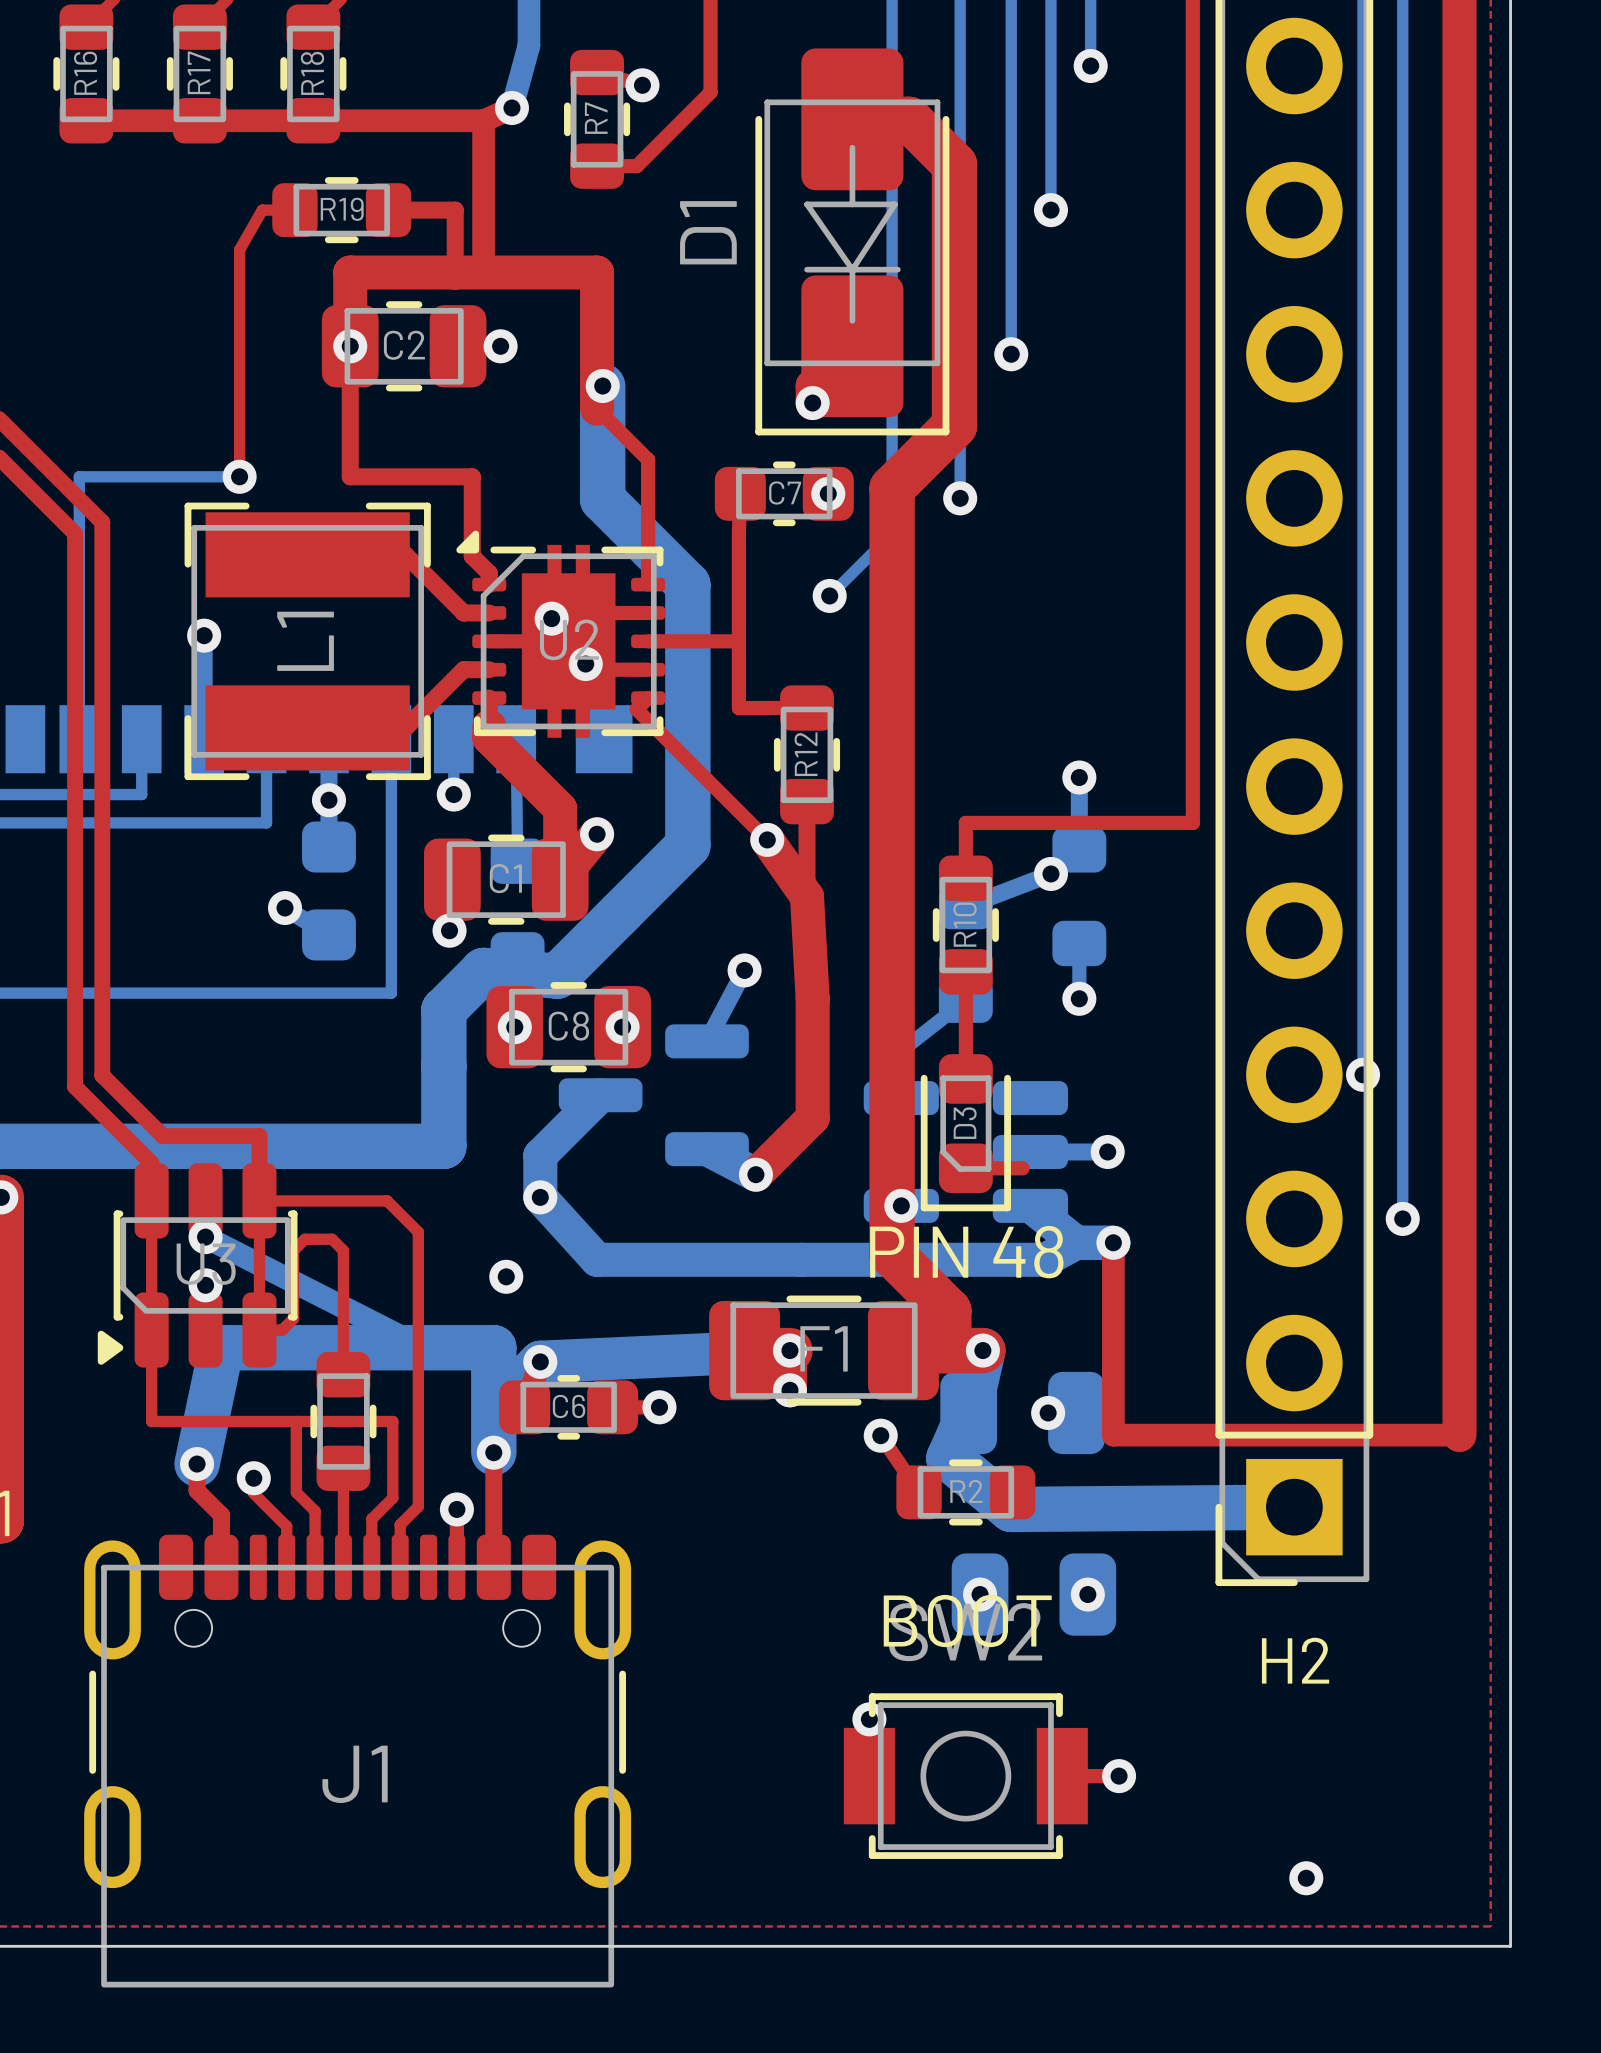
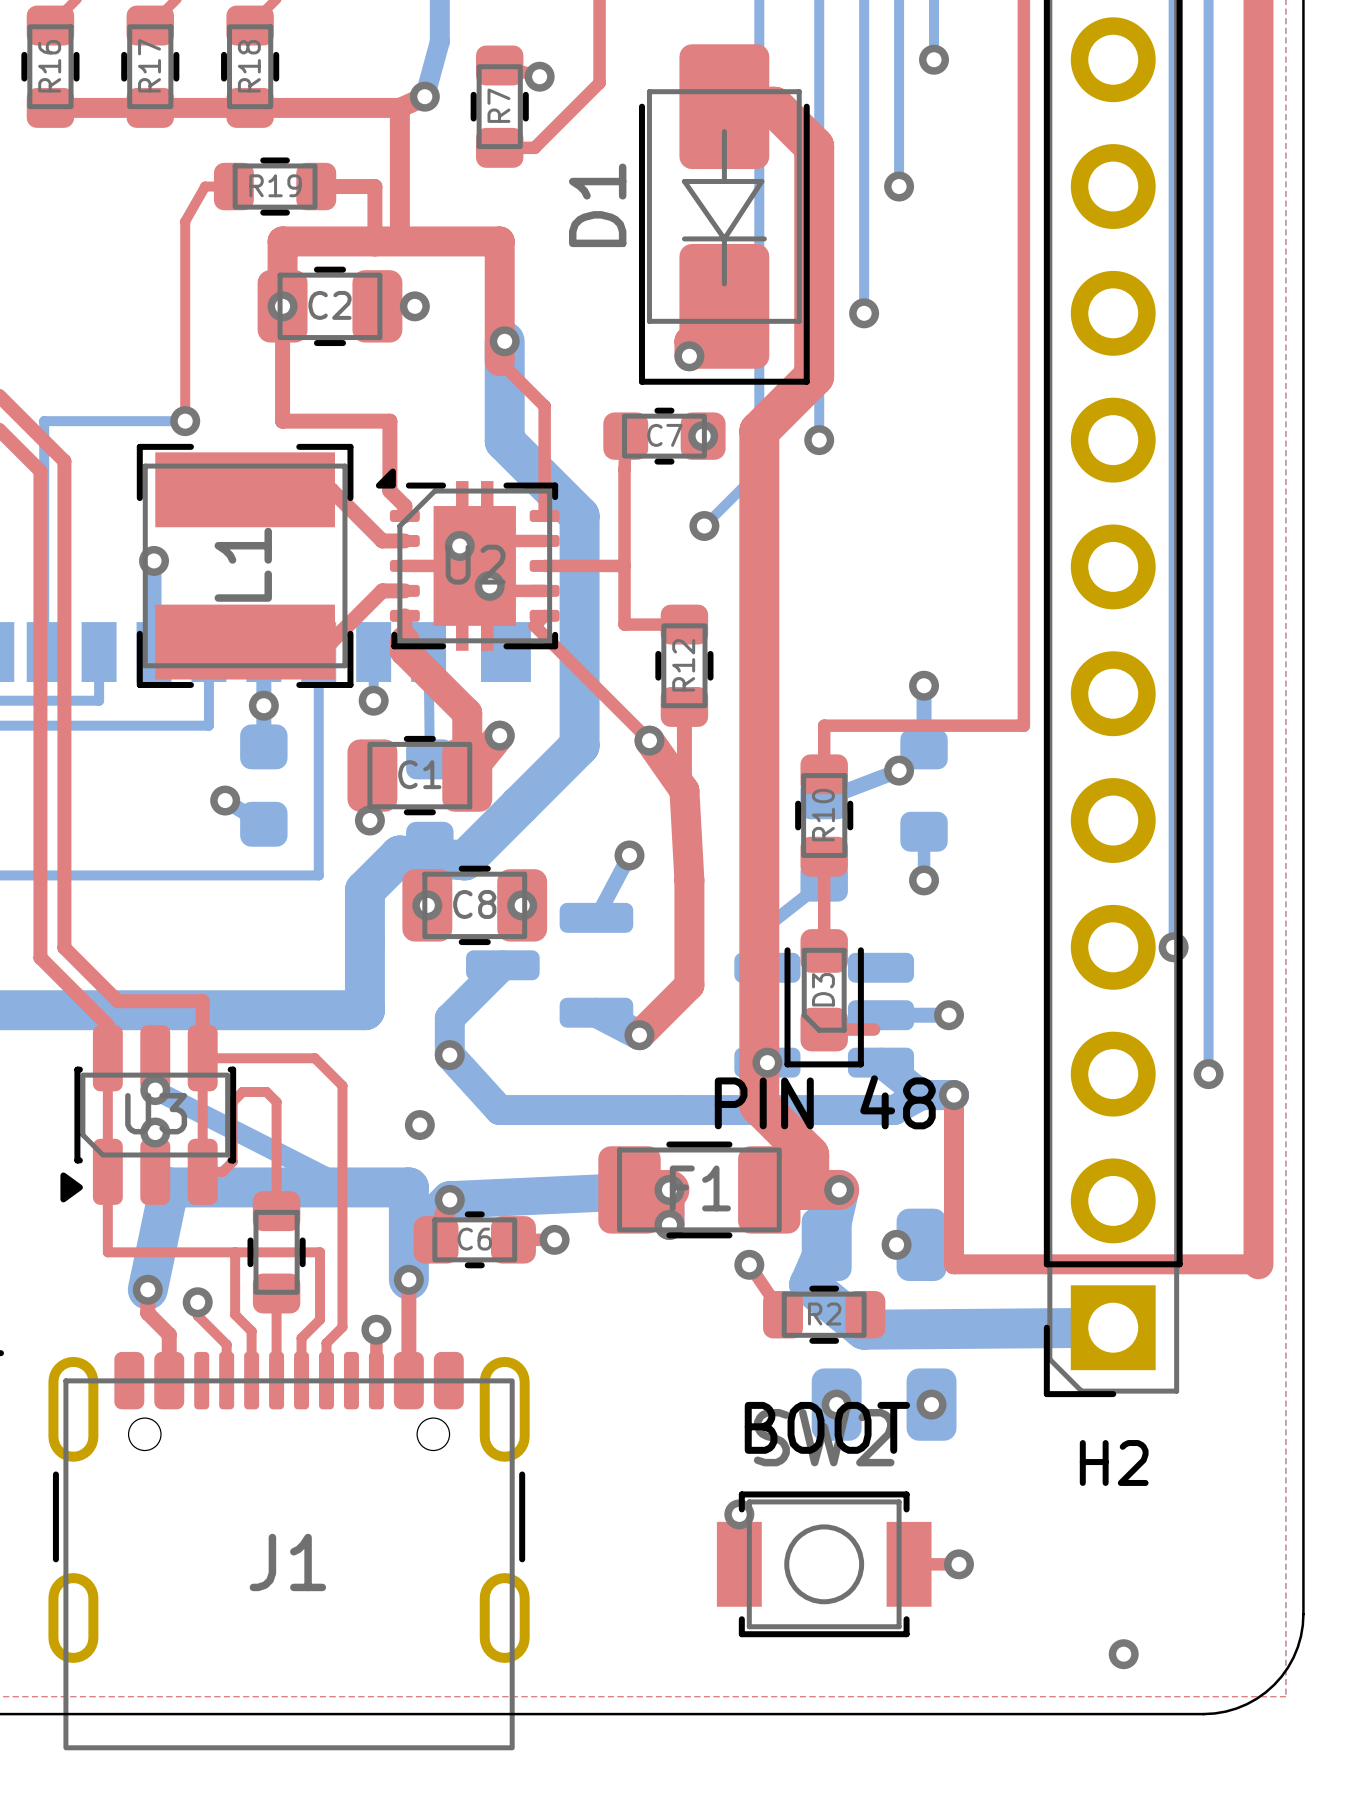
board edge: (1510, 1832) (1510, 1946) (1397, 1946) -> (1303, 1614) (1300, 1636) (1293, 1657) (1274, 1684) (1246, 1704) (1225, 1711) (1203, 1714)

